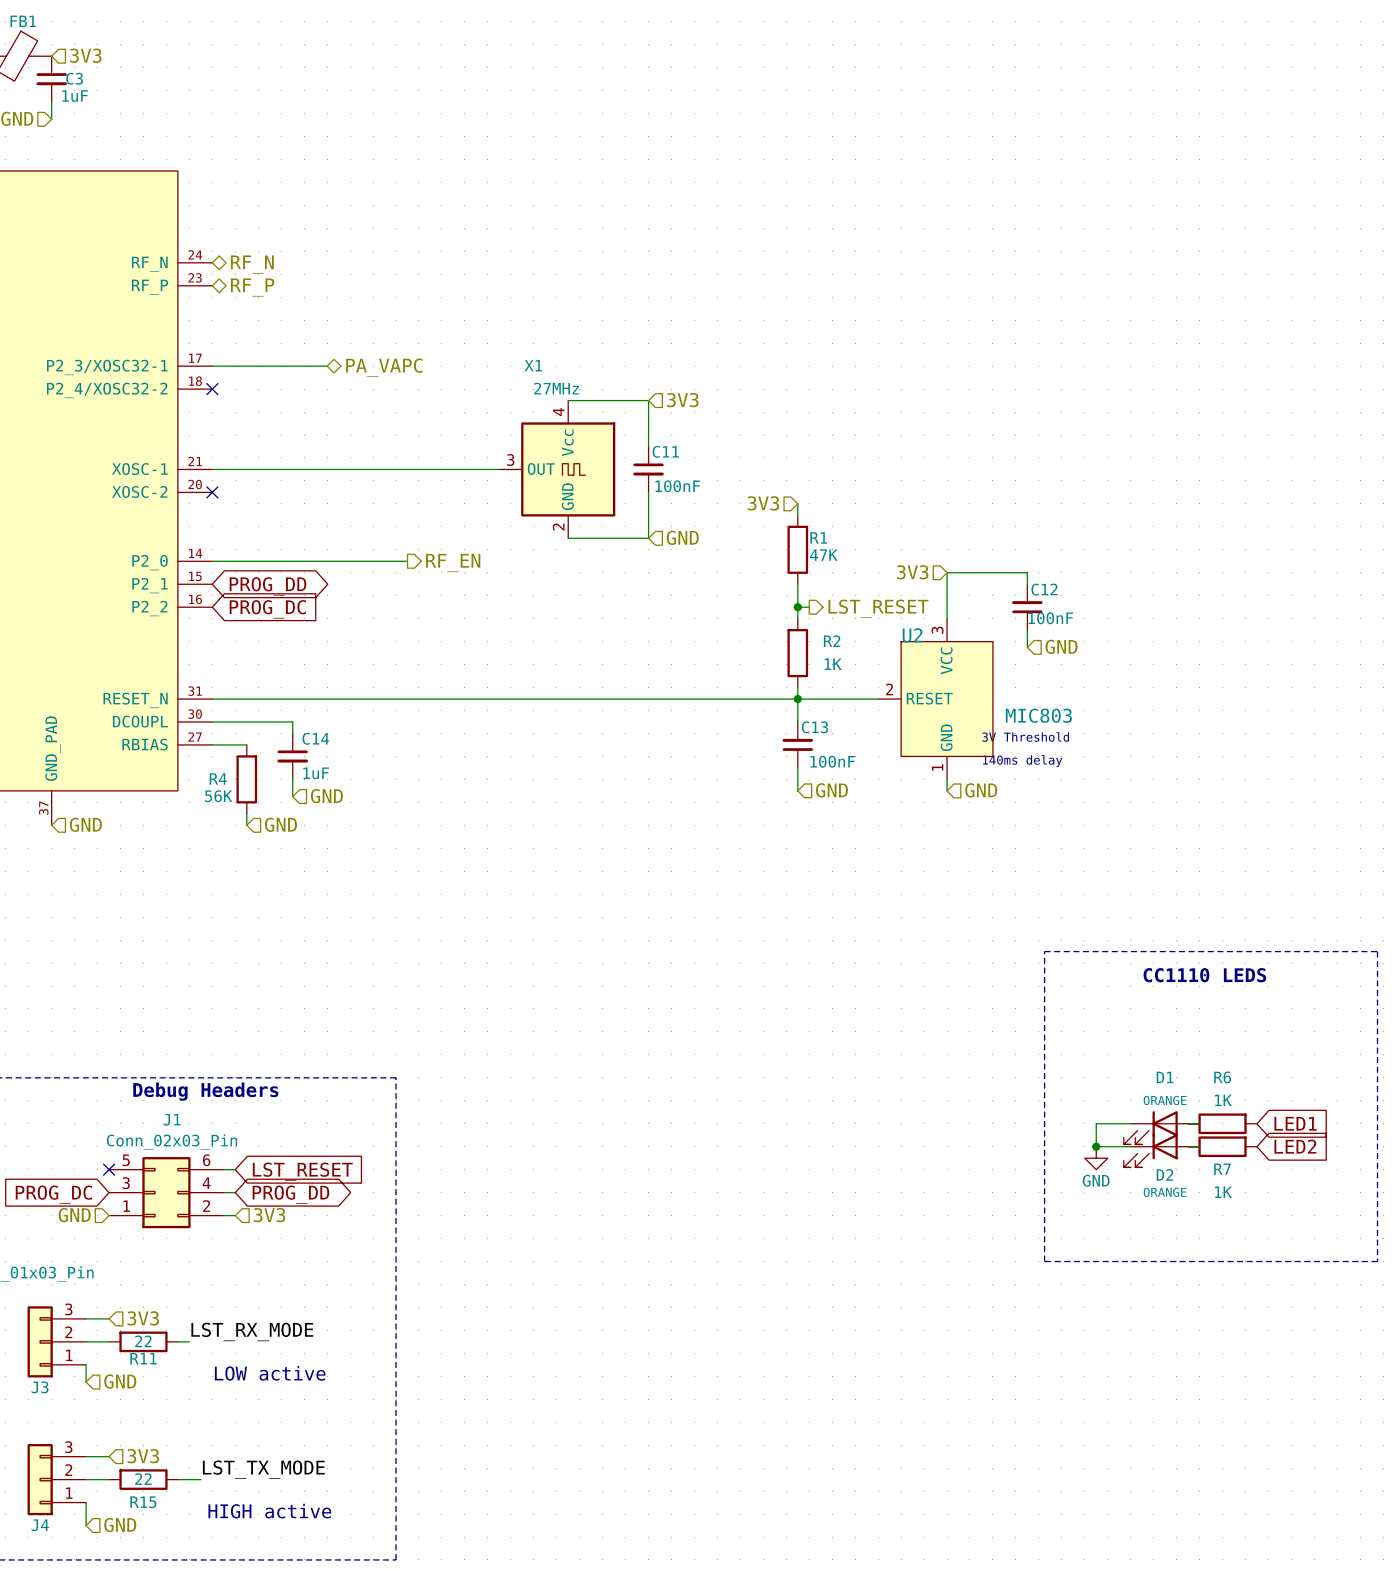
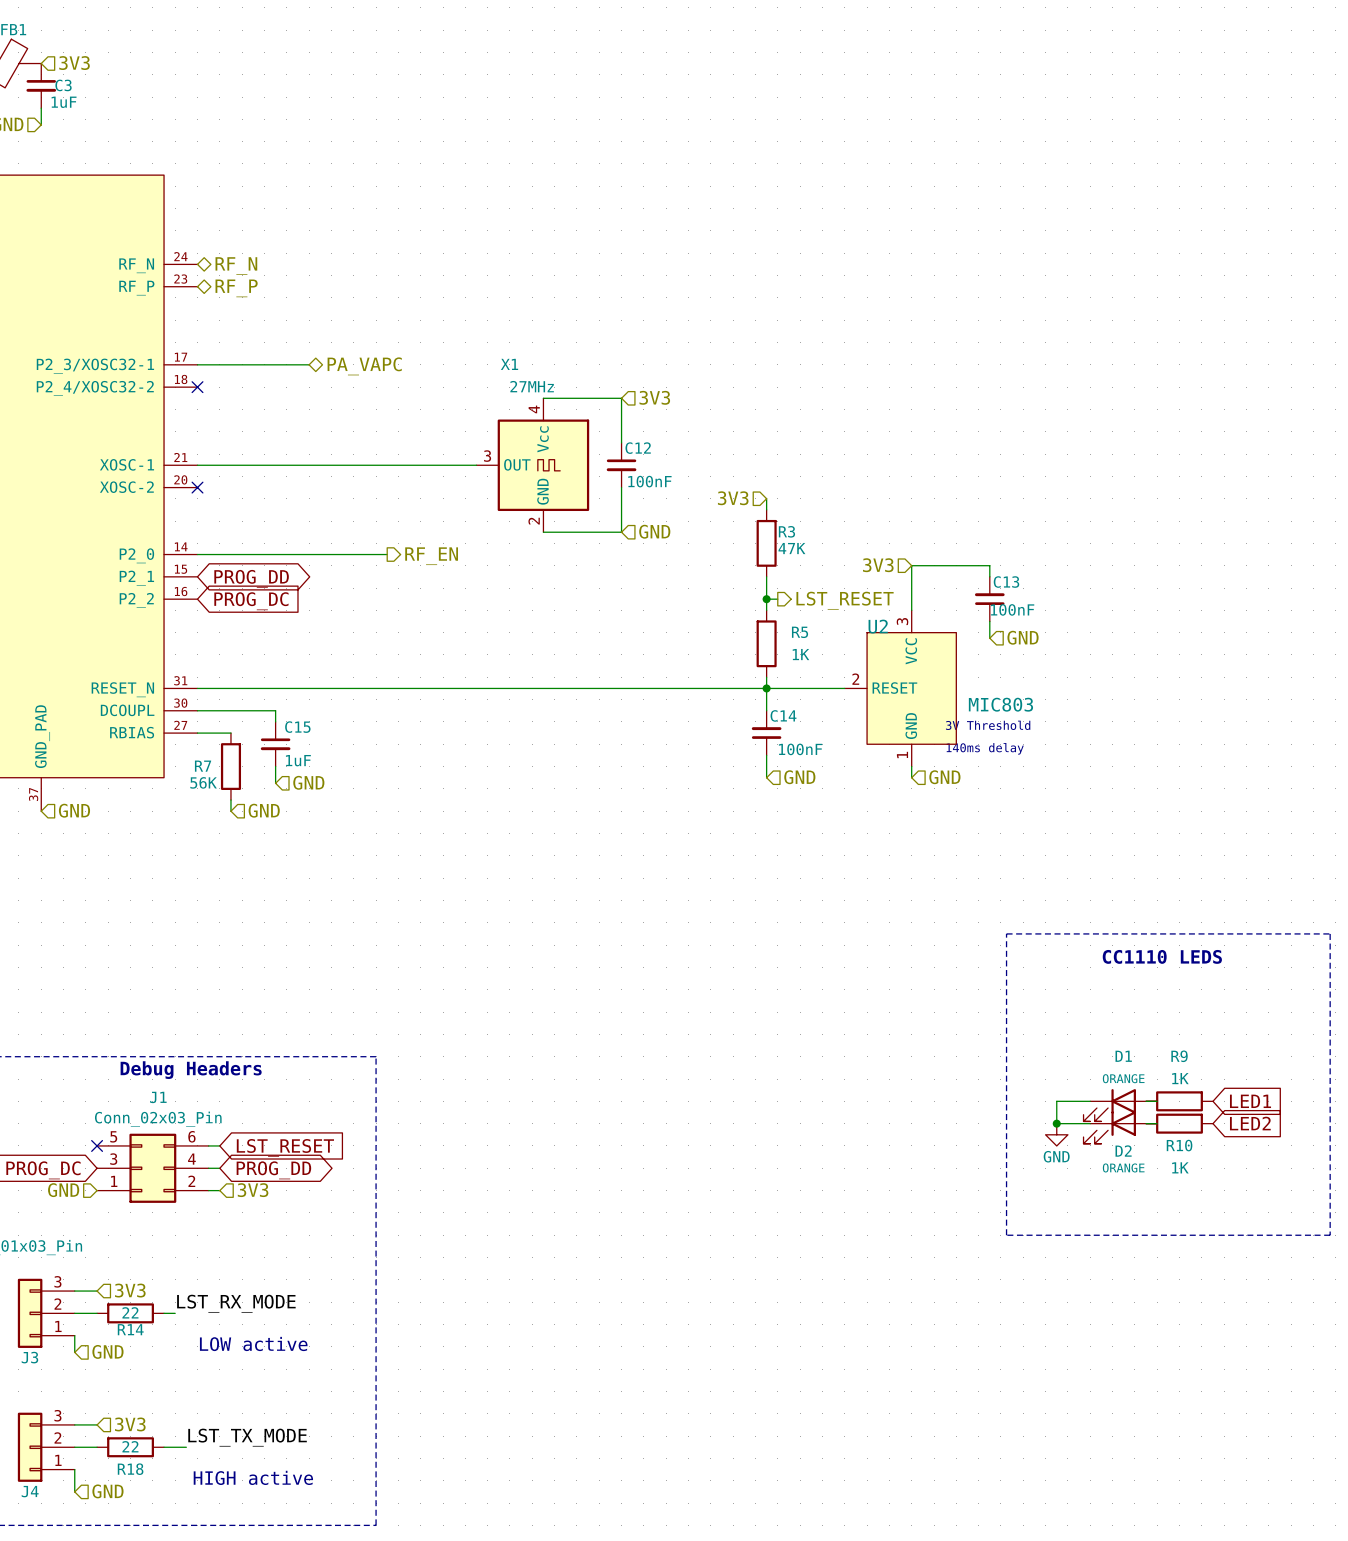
C11 name: C11 (665, 451) -> C12 (638, 448)
R1 name: R1 (818, 537) -> R3 (786, 531)
C12 name: C12 (1044, 589) -> C13 (1006, 582)
R2 name: R2 (832, 641) -> R5 (800, 632)
C13 name: C13 (814, 727) -> C14 (783, 715)
C14 name: C14 (315, 738) -> C15 (297, 727)
R4 name: R4 (218, 778) -> R7 (203, 766)
R6 name: R6 (1222, 1077) -> R9 (1179, 1056)
R7 name: R7 (1222, 1169) -> R10 (1179, 1145)
R11 name: R11 (143, 1358) -> R14 (130, 1329)
R15 name: R15 (143, 1502) -> R18 (130, 1469)

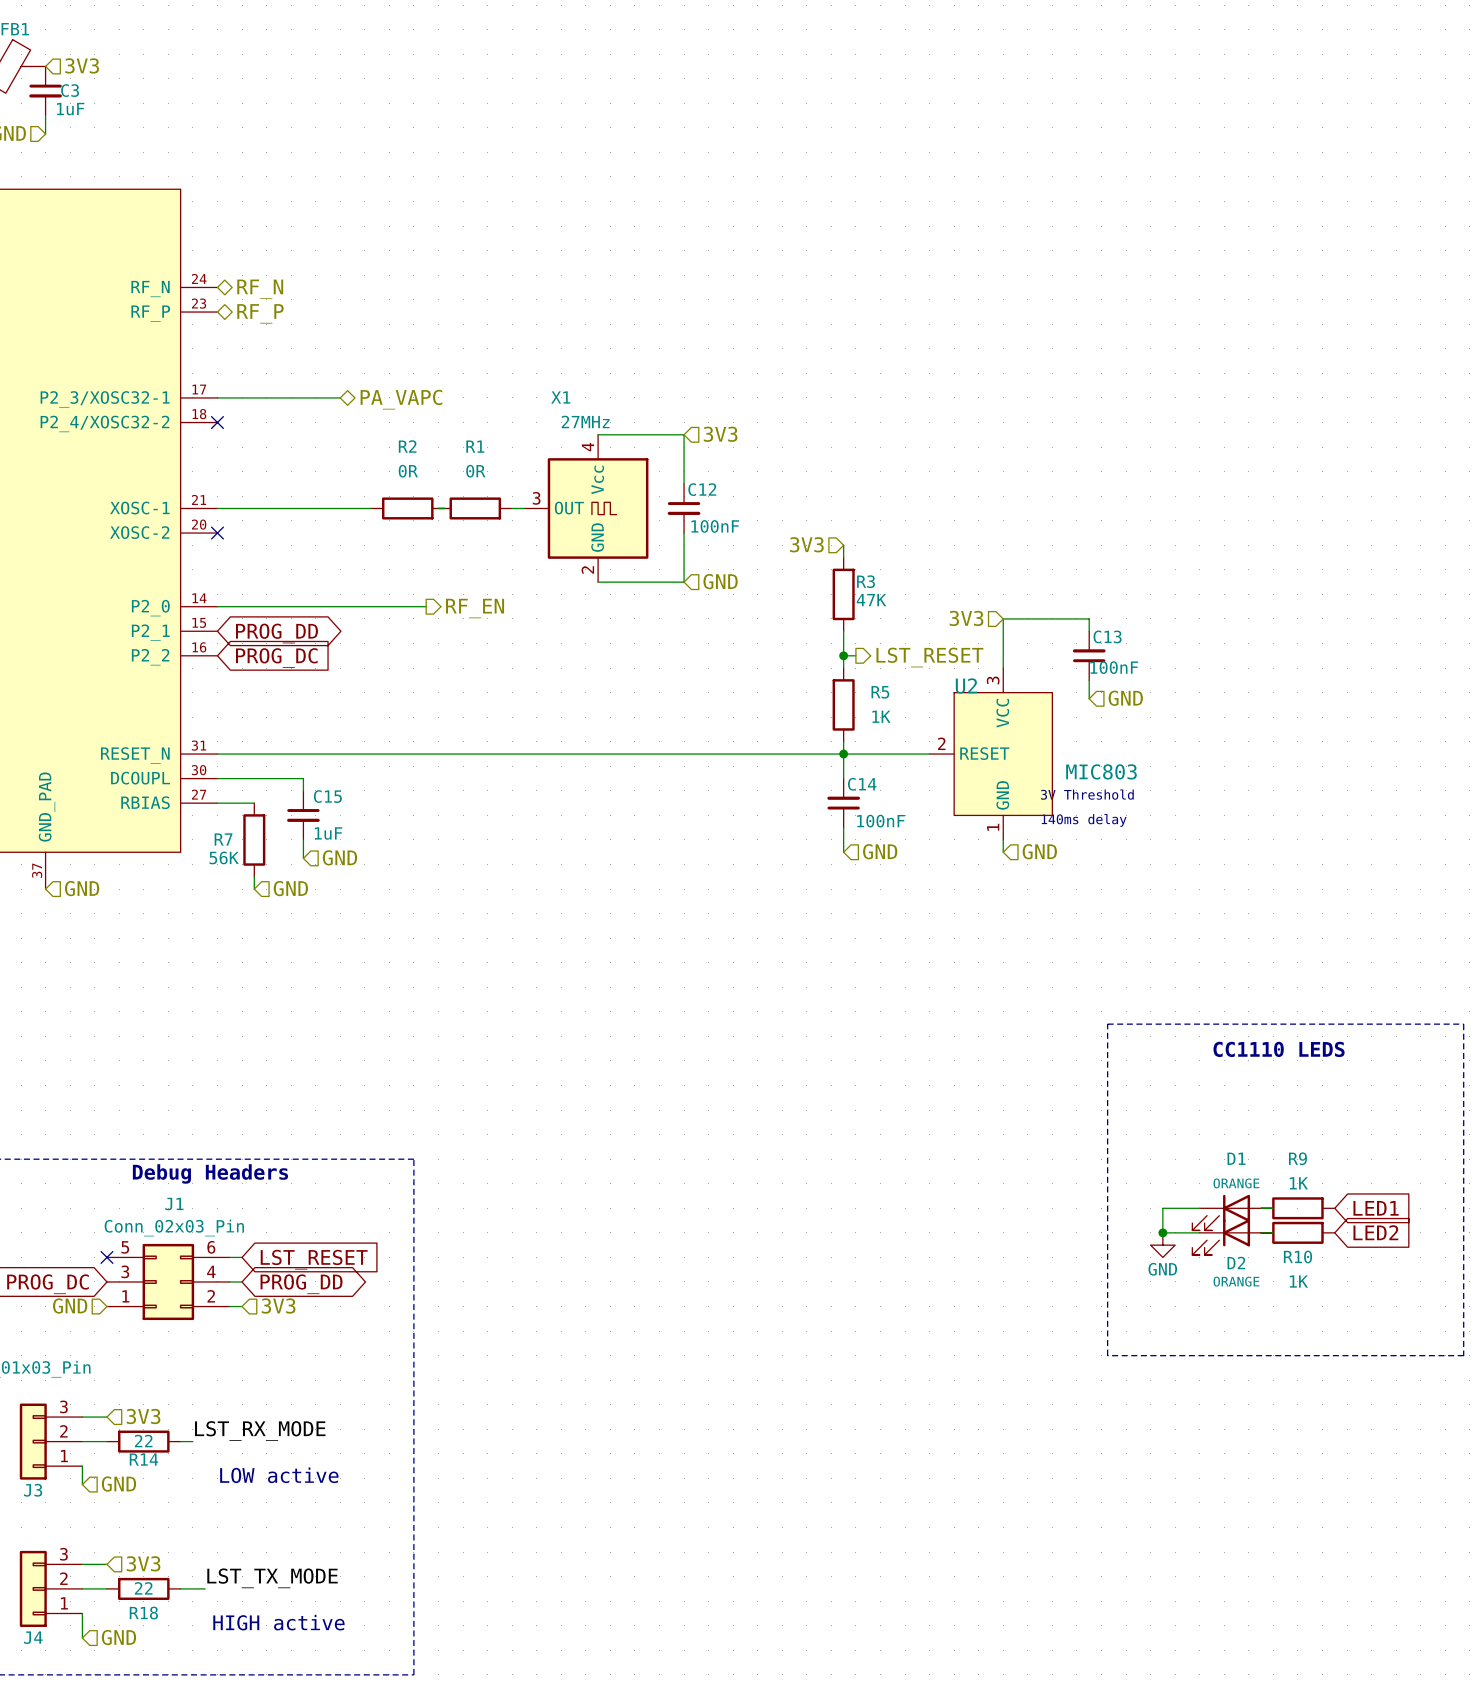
wire: (336, 465) (398, 465) -> none
R2: none -> 0R (407, 508)
wire: (403, 465) (465, 465) -> none
R1: none -> 0R (475, 508)

